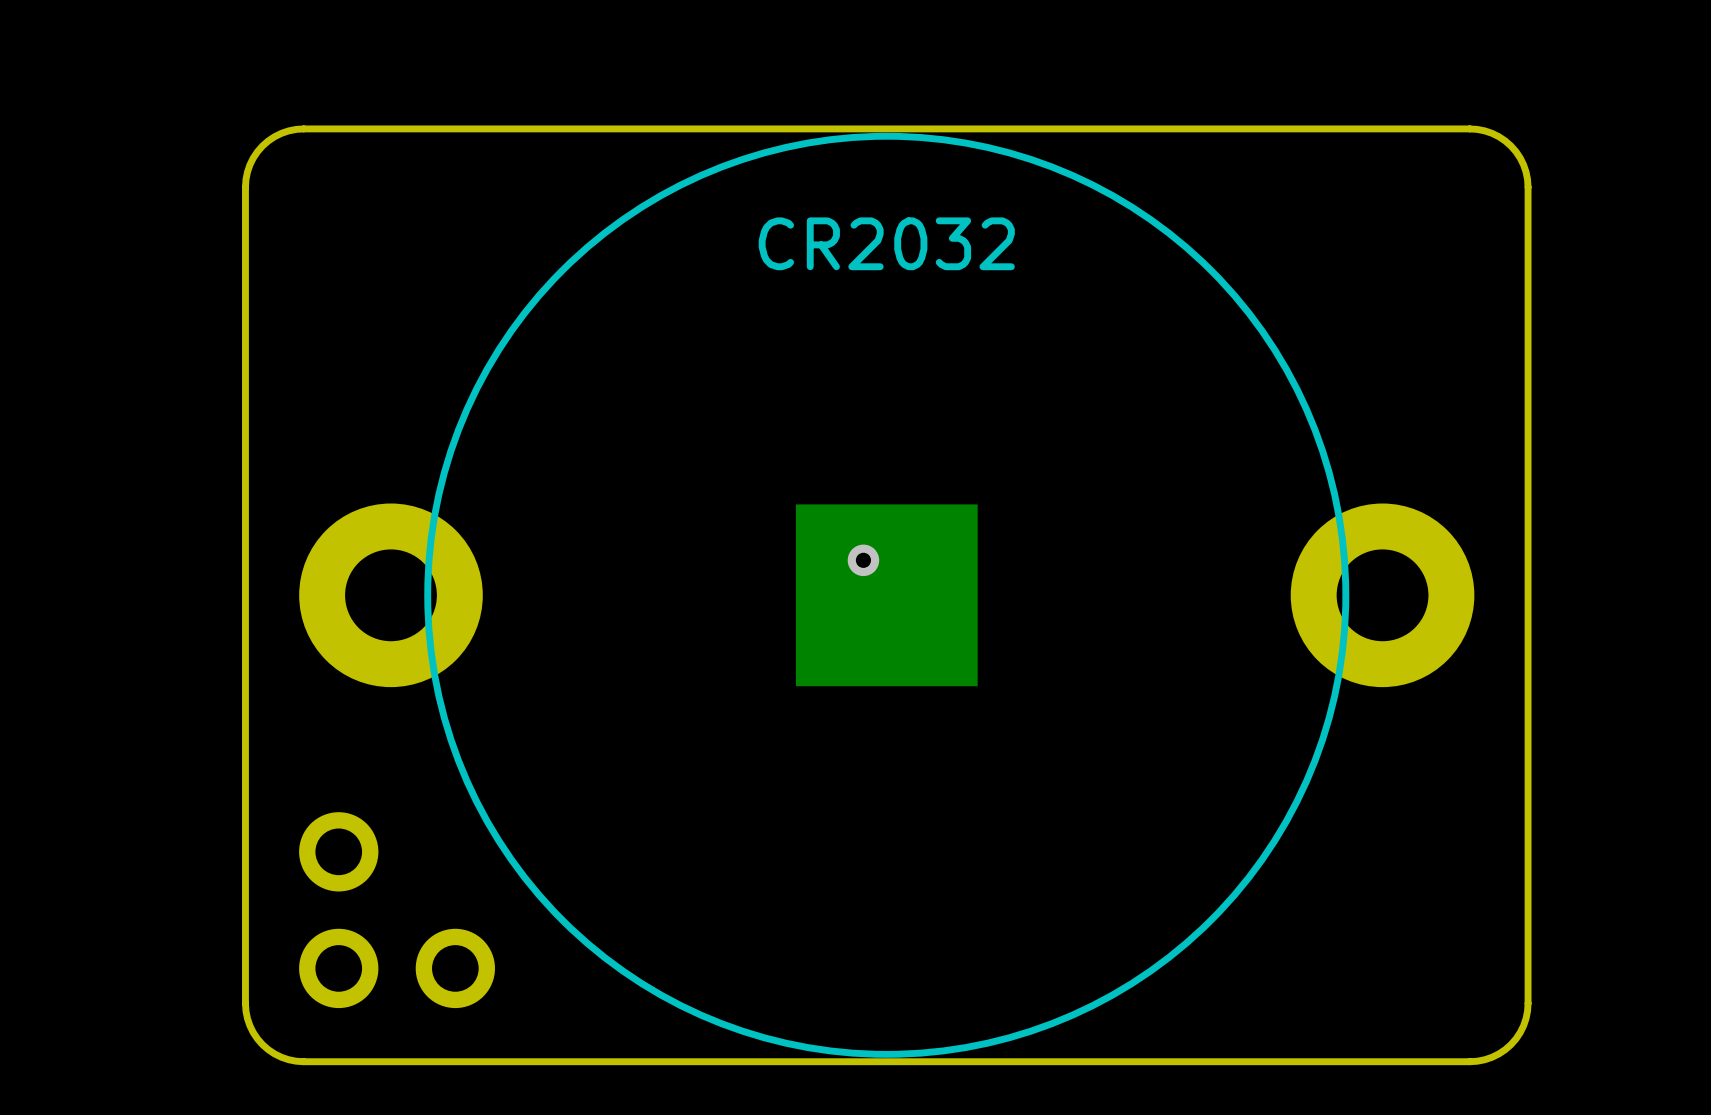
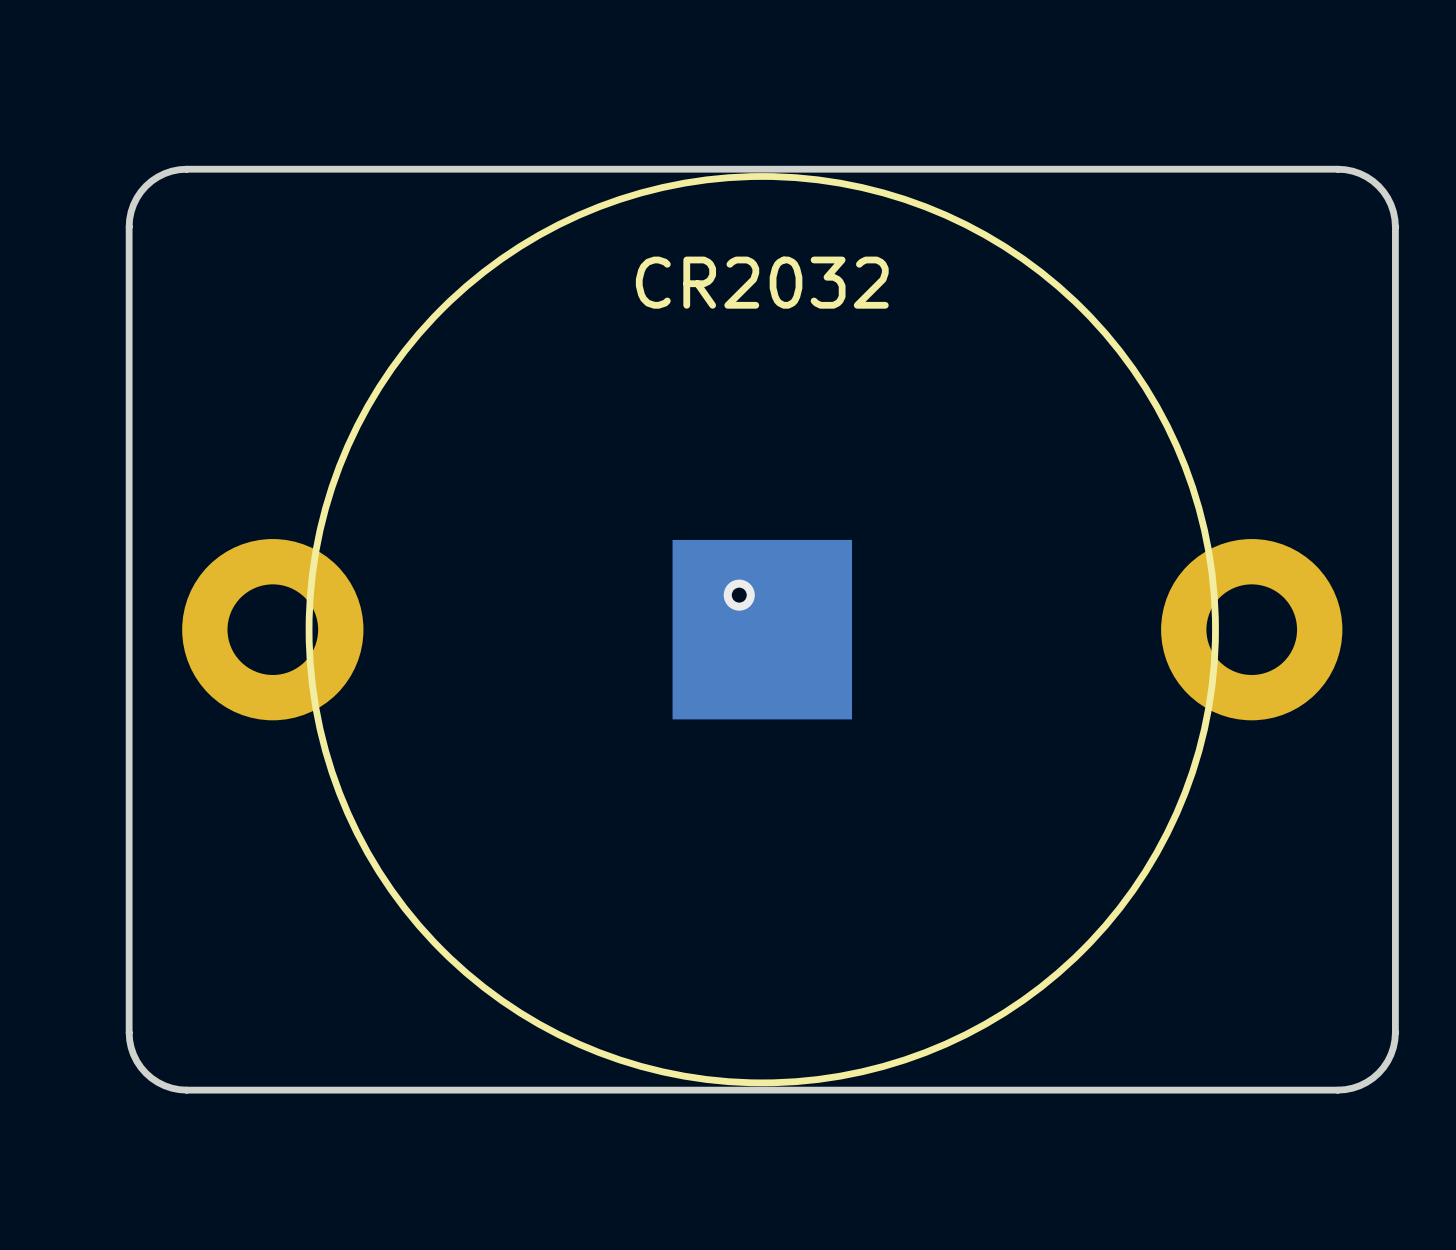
part: (397, 910) -> none

